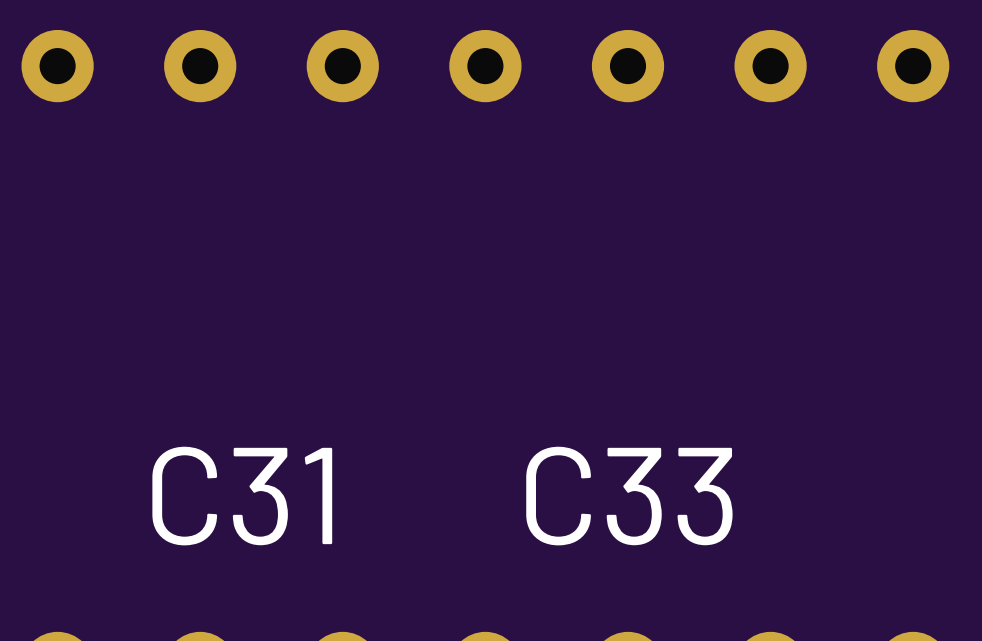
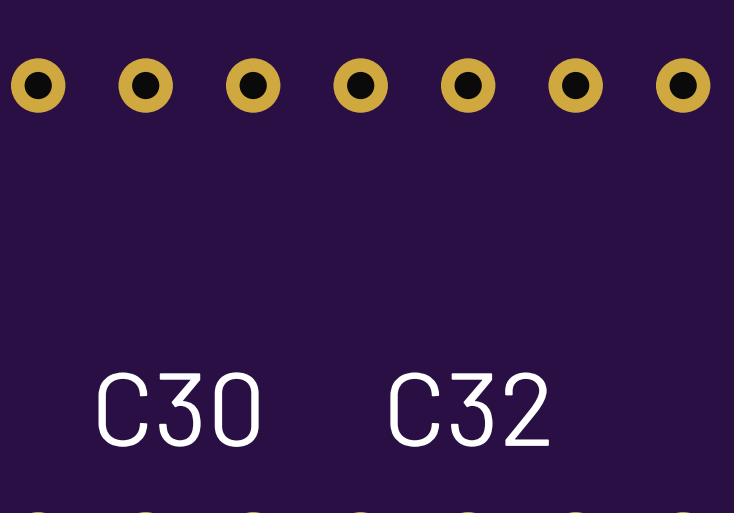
text: C31 (242, 496) -> C30 (178, 409)
text: C33 (629, 496) -> C32 (469, 409)

